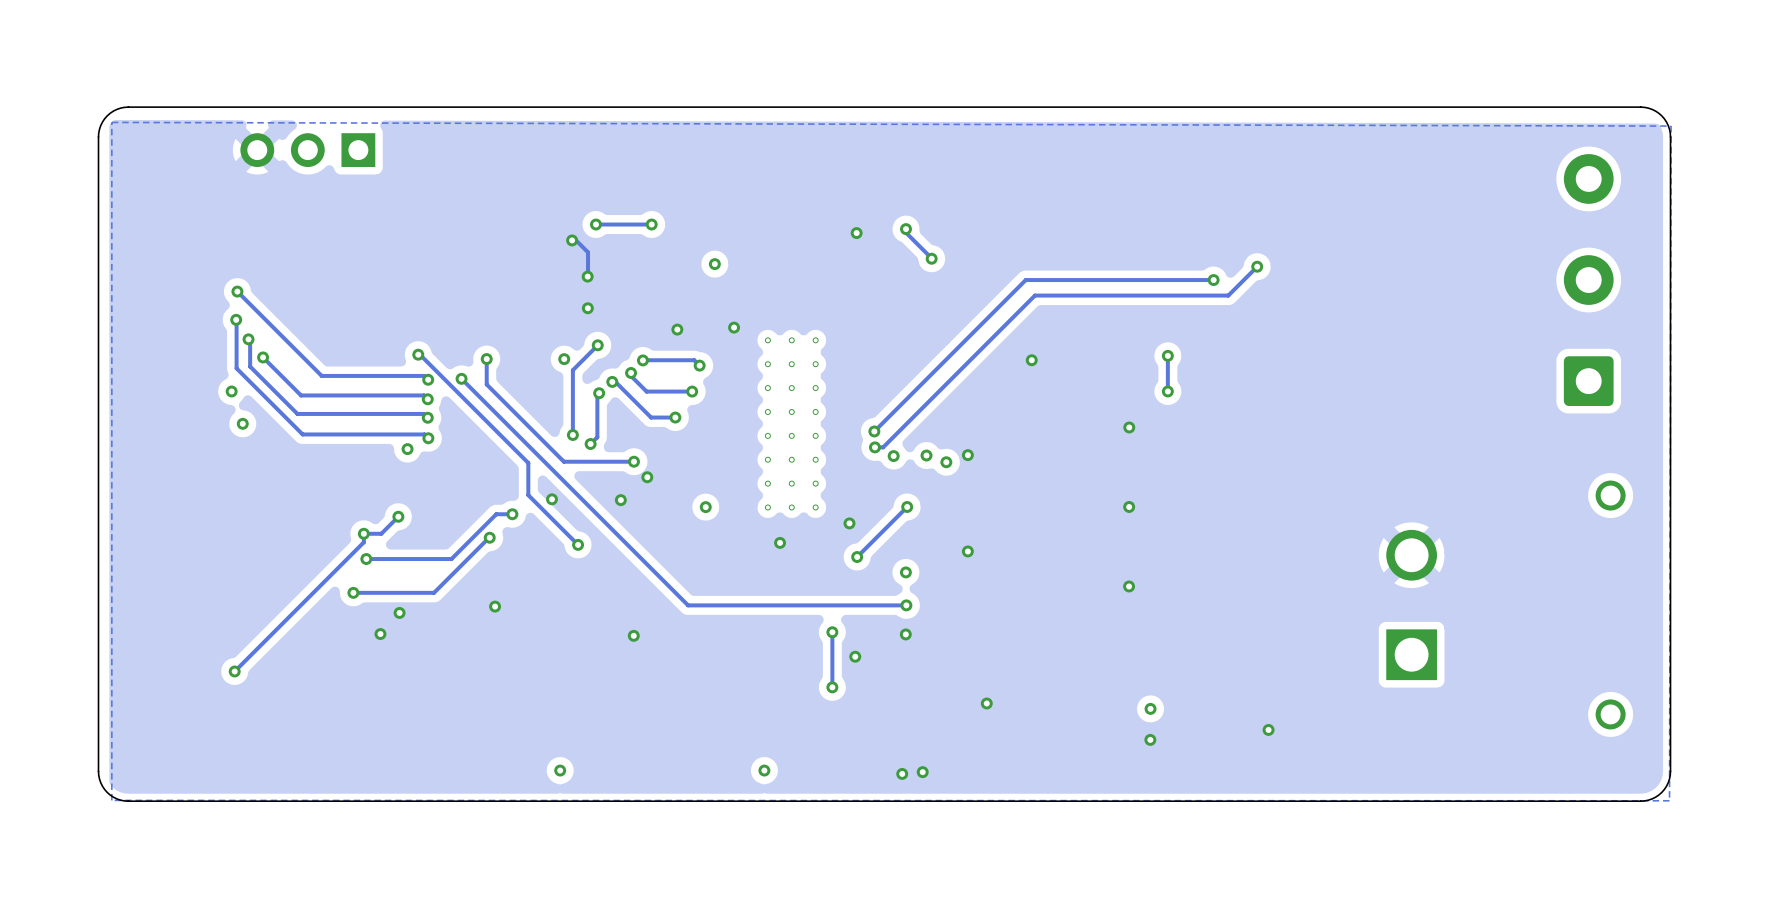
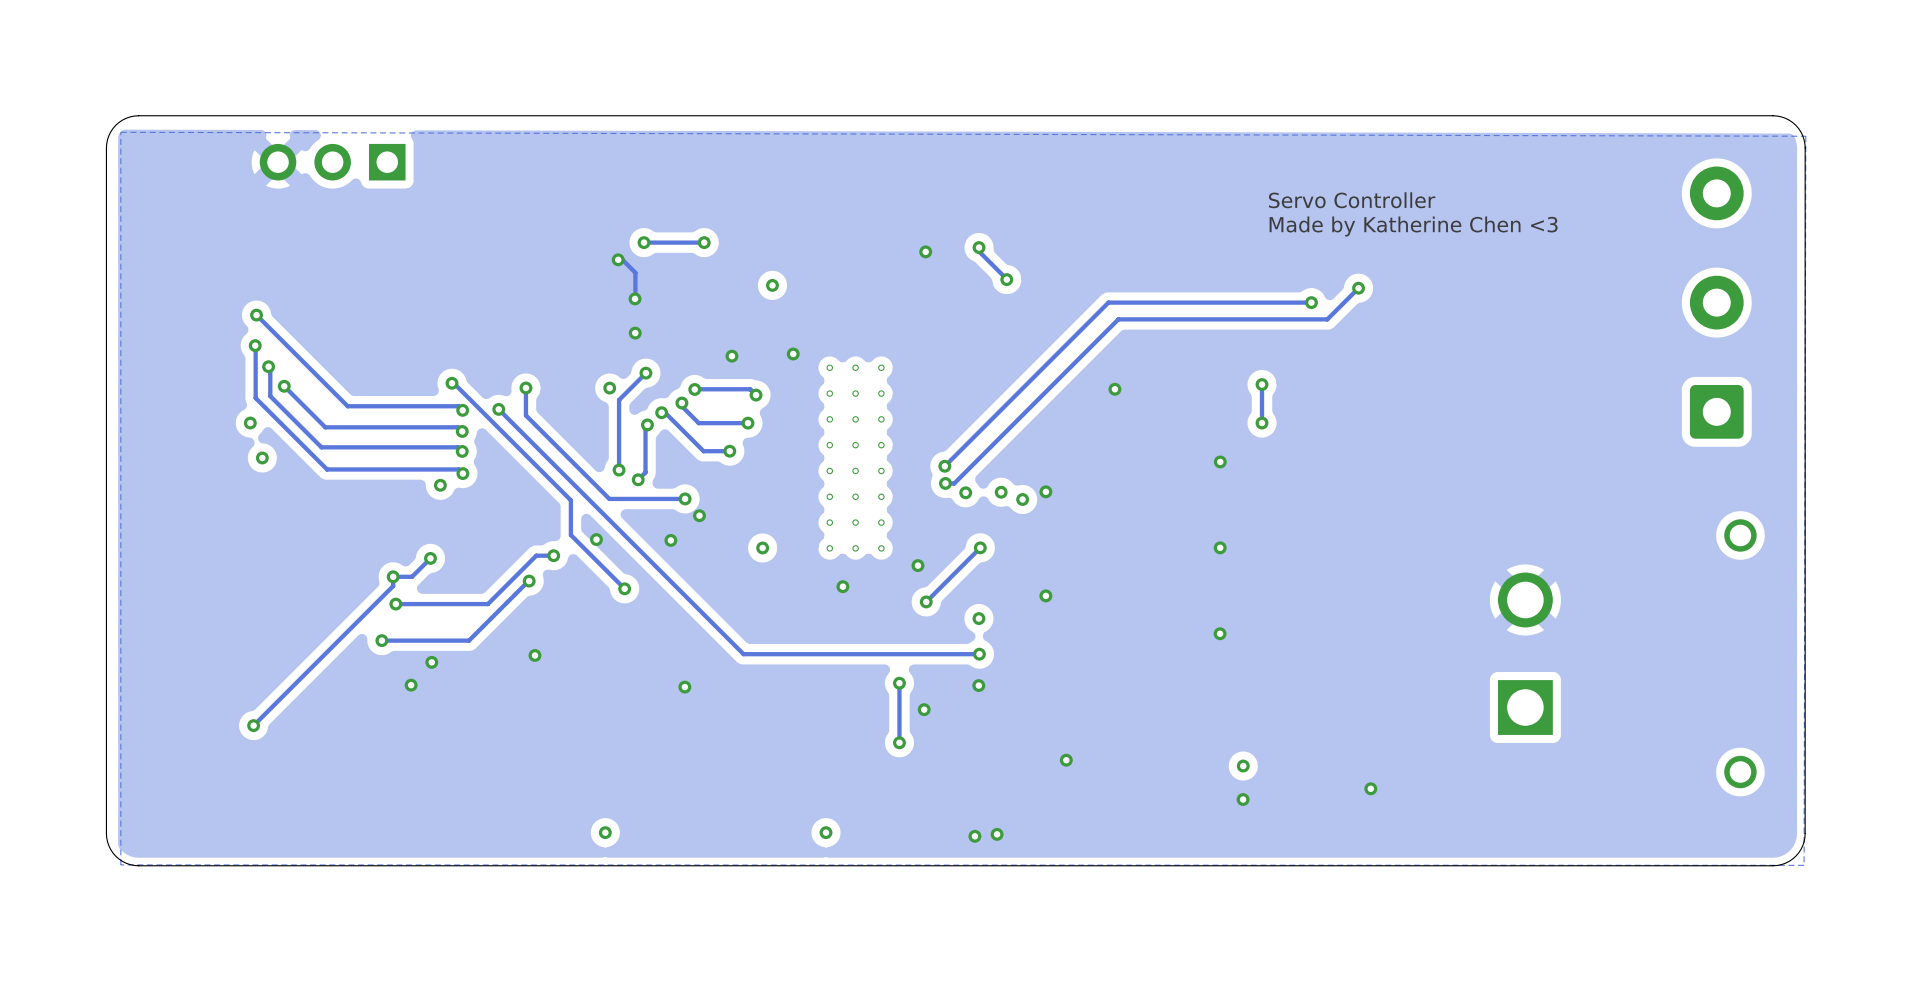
text: none -> Servo Controller (1352, 200)
text: none -> Made by Katherine Chen <3 (1413, 226)

